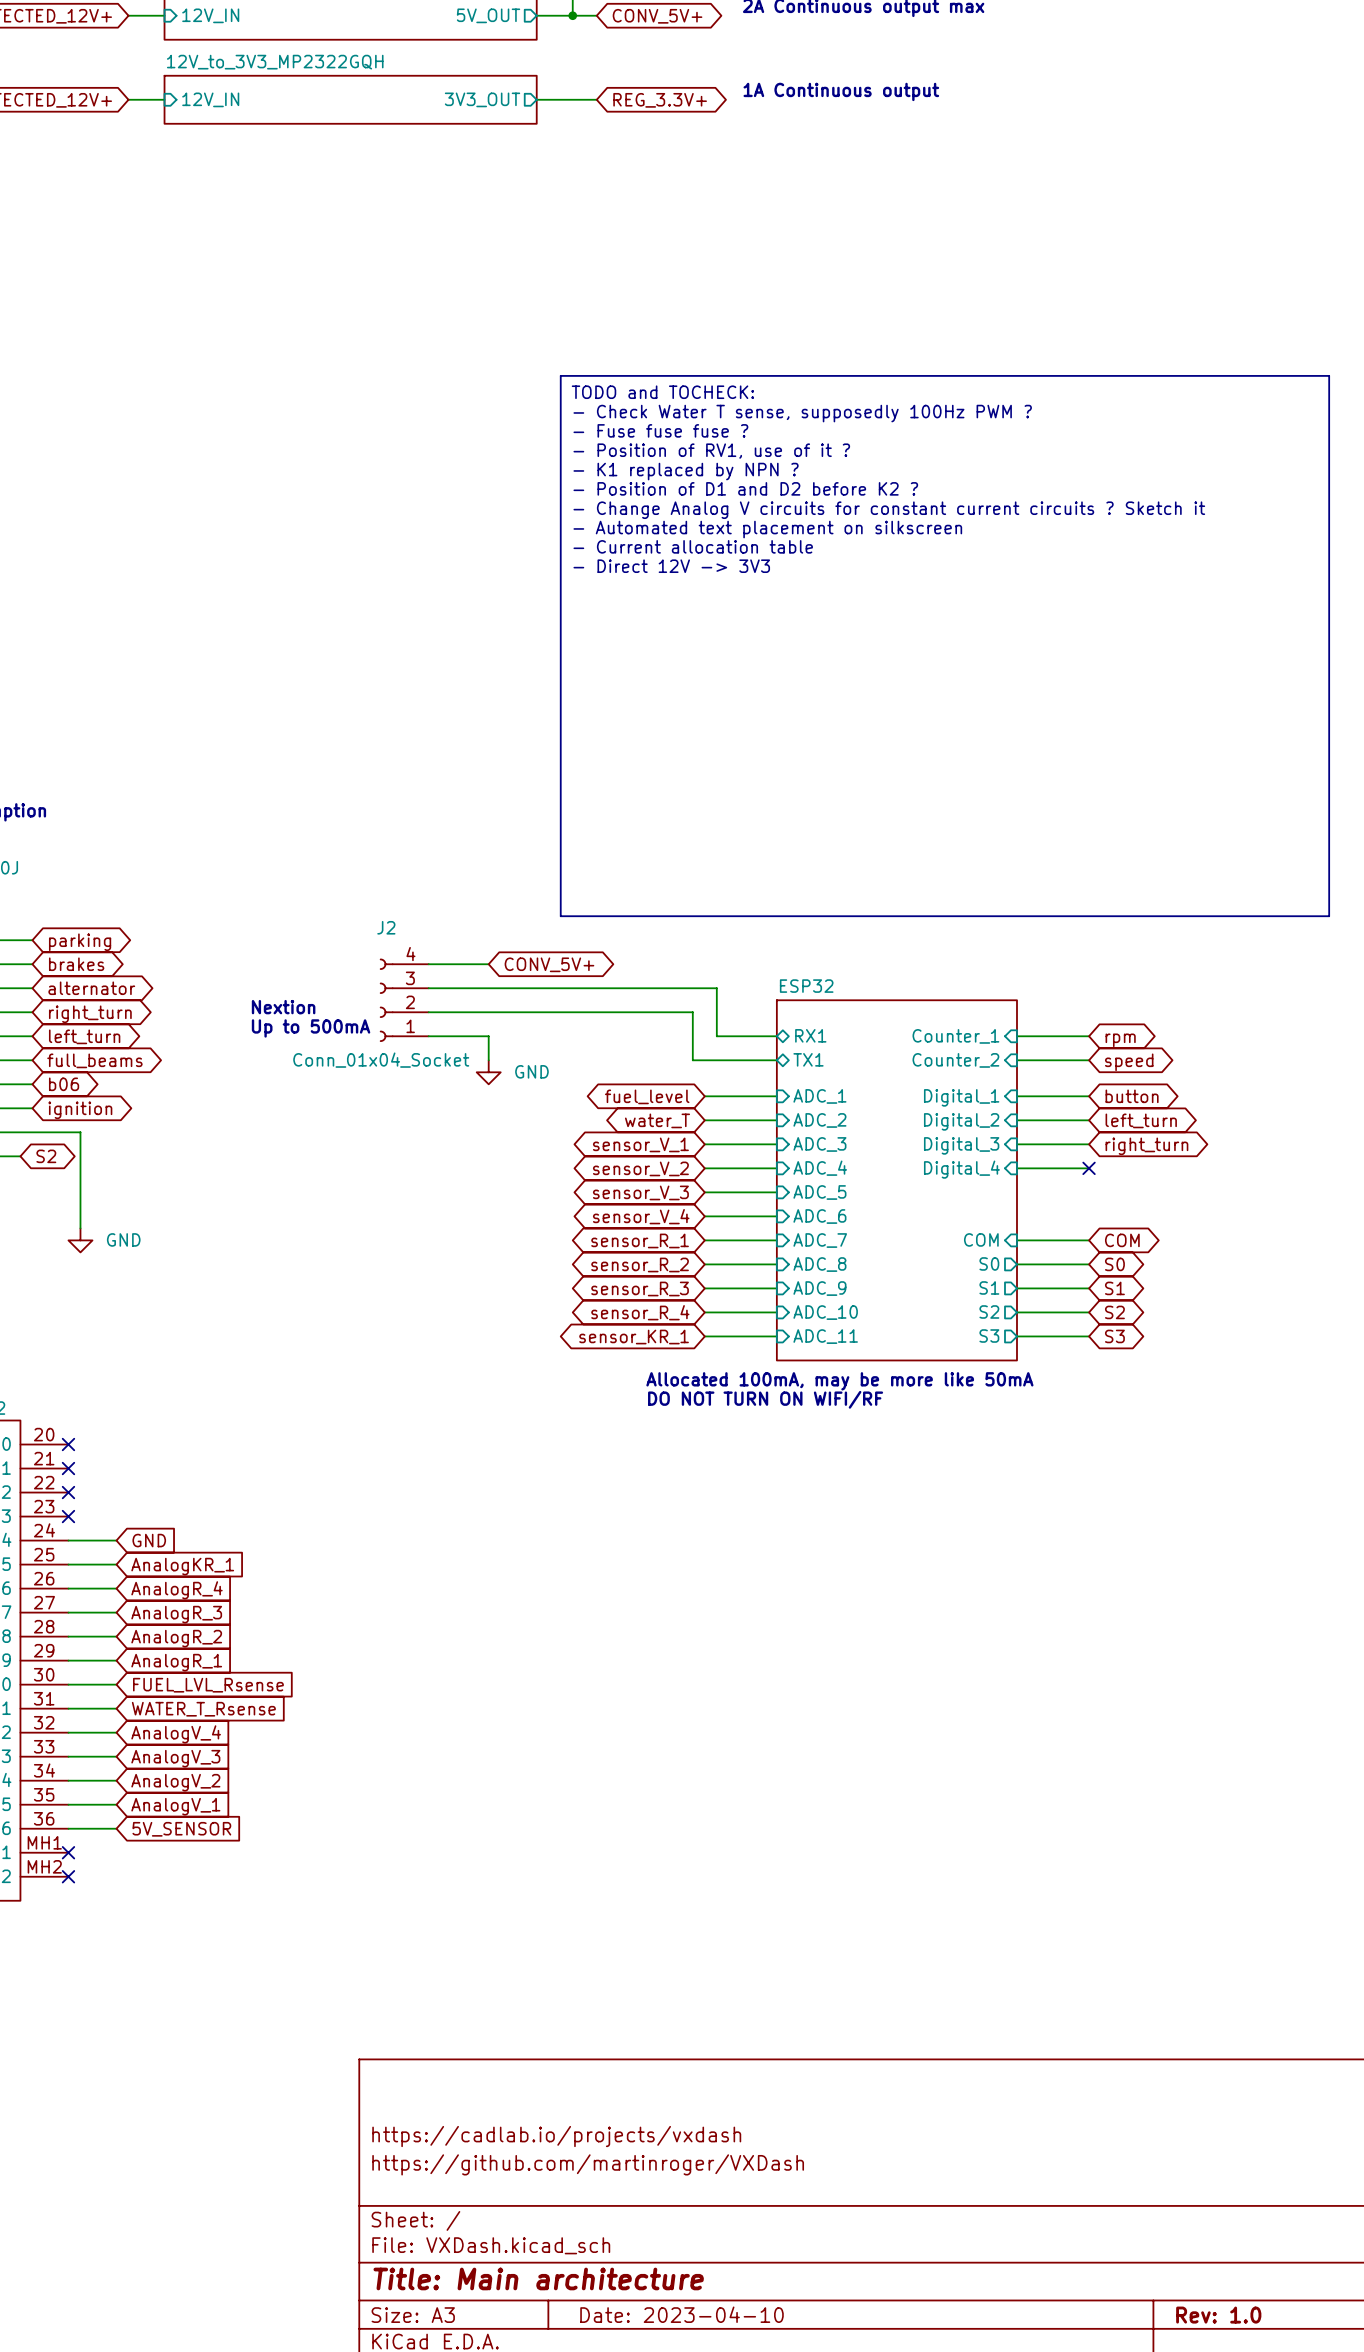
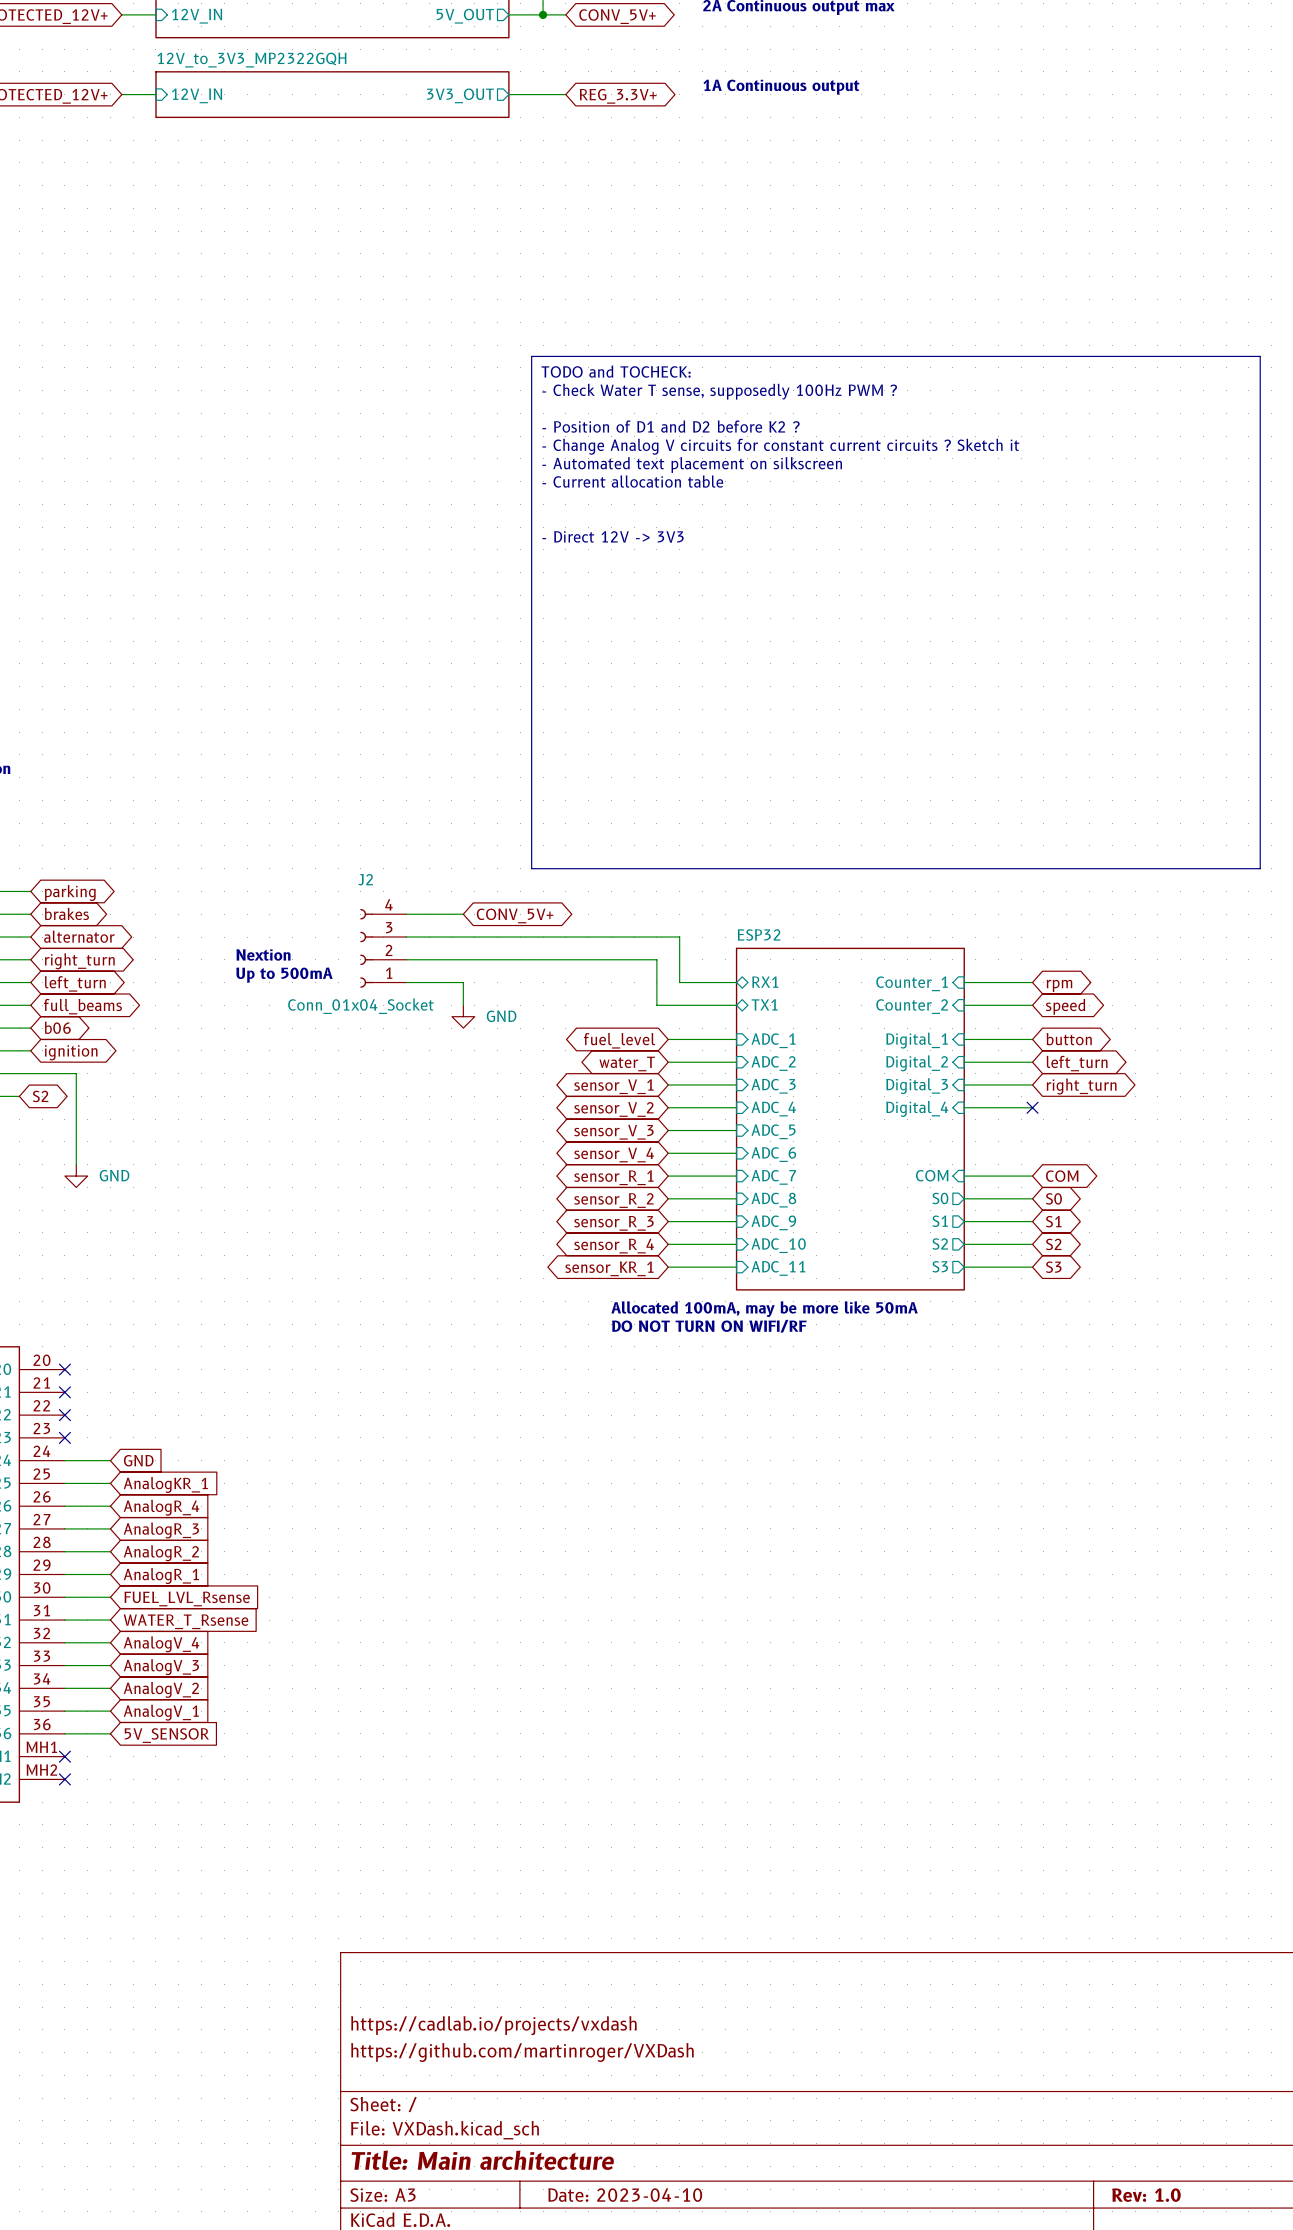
text: - Fuse fuse fuse ? (660, 430) -> none
text: - Position of RV1, use of it ? (711, 451) -> - Position of D1 and D2 before K2 ? (671, 426)
text: - K1 replaced by NPN ? (686, 471) -> - Change Analog V circuits for constant current circuits ? Sketch it (780, 446)
text: - Position of D1 and D2 before K2 ? (745, 488) -> - Automated text placement on silkscreen (692, 465)
text: - Change Analog V circuits for constant current circuits ? Sketch it (889, 510) -> - Current allocation table (632, 481)
text: - Automated text placement on silkscreen (767, 529) -> none
text: - Current allocation table (693, 546) -> none

